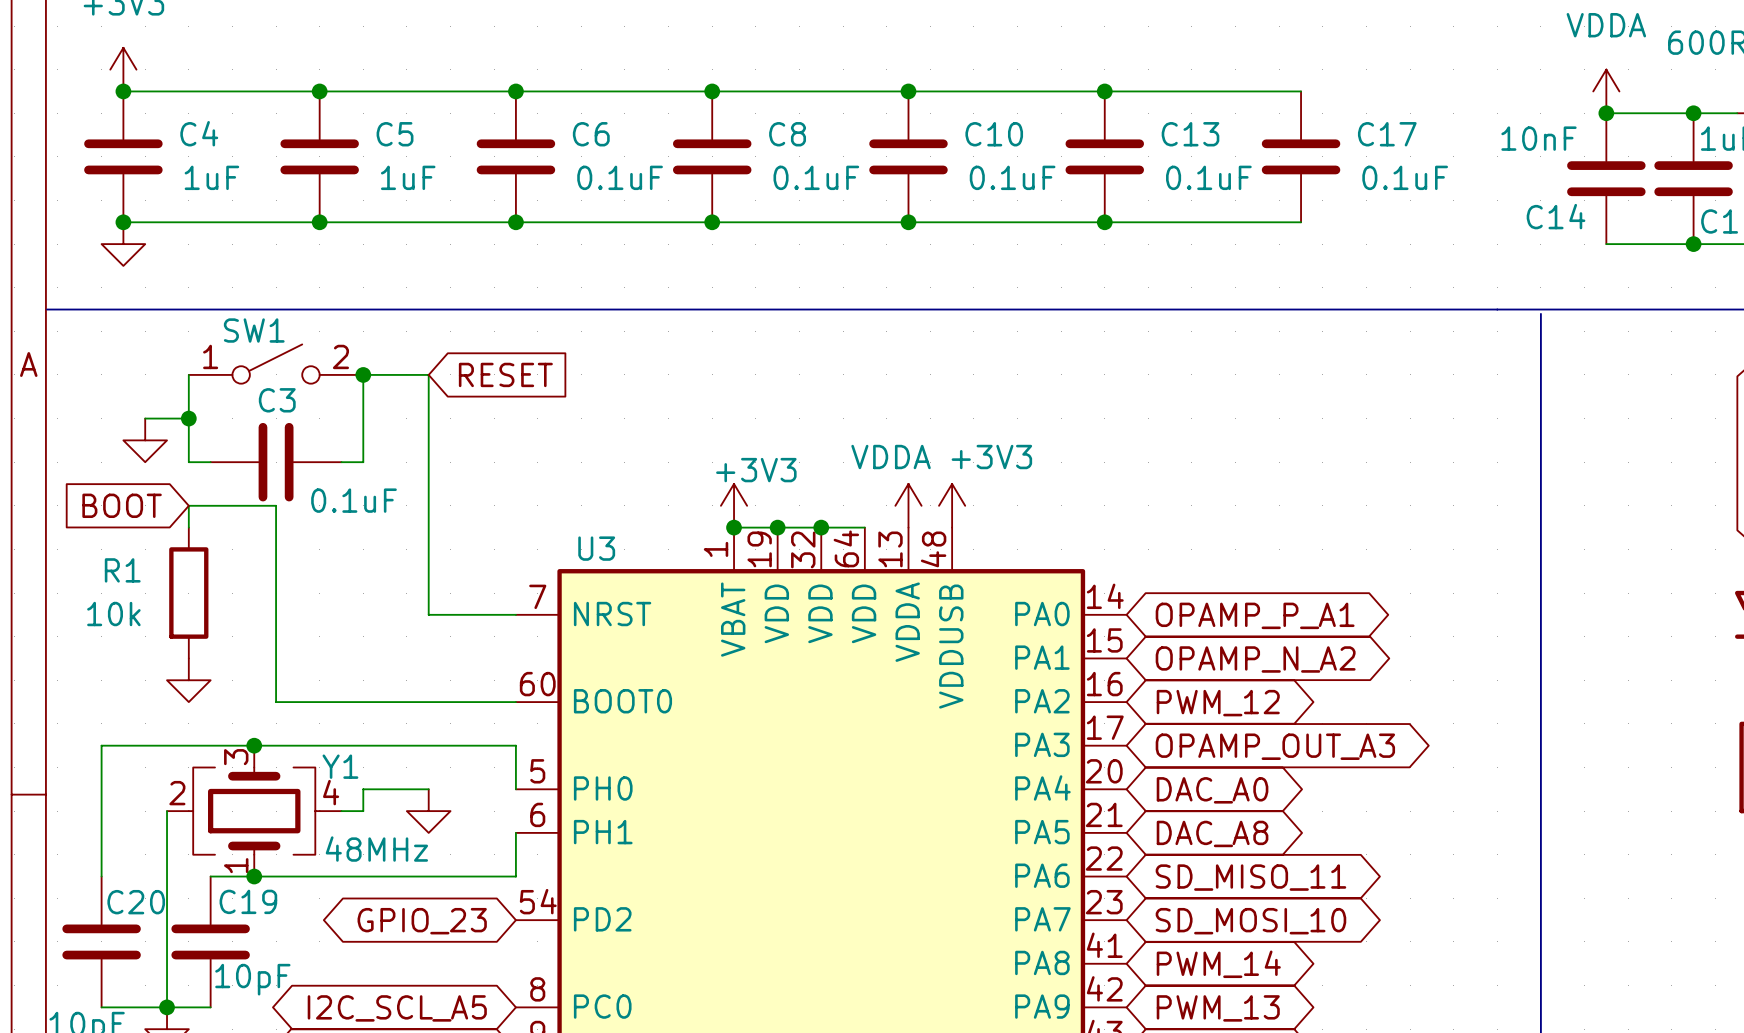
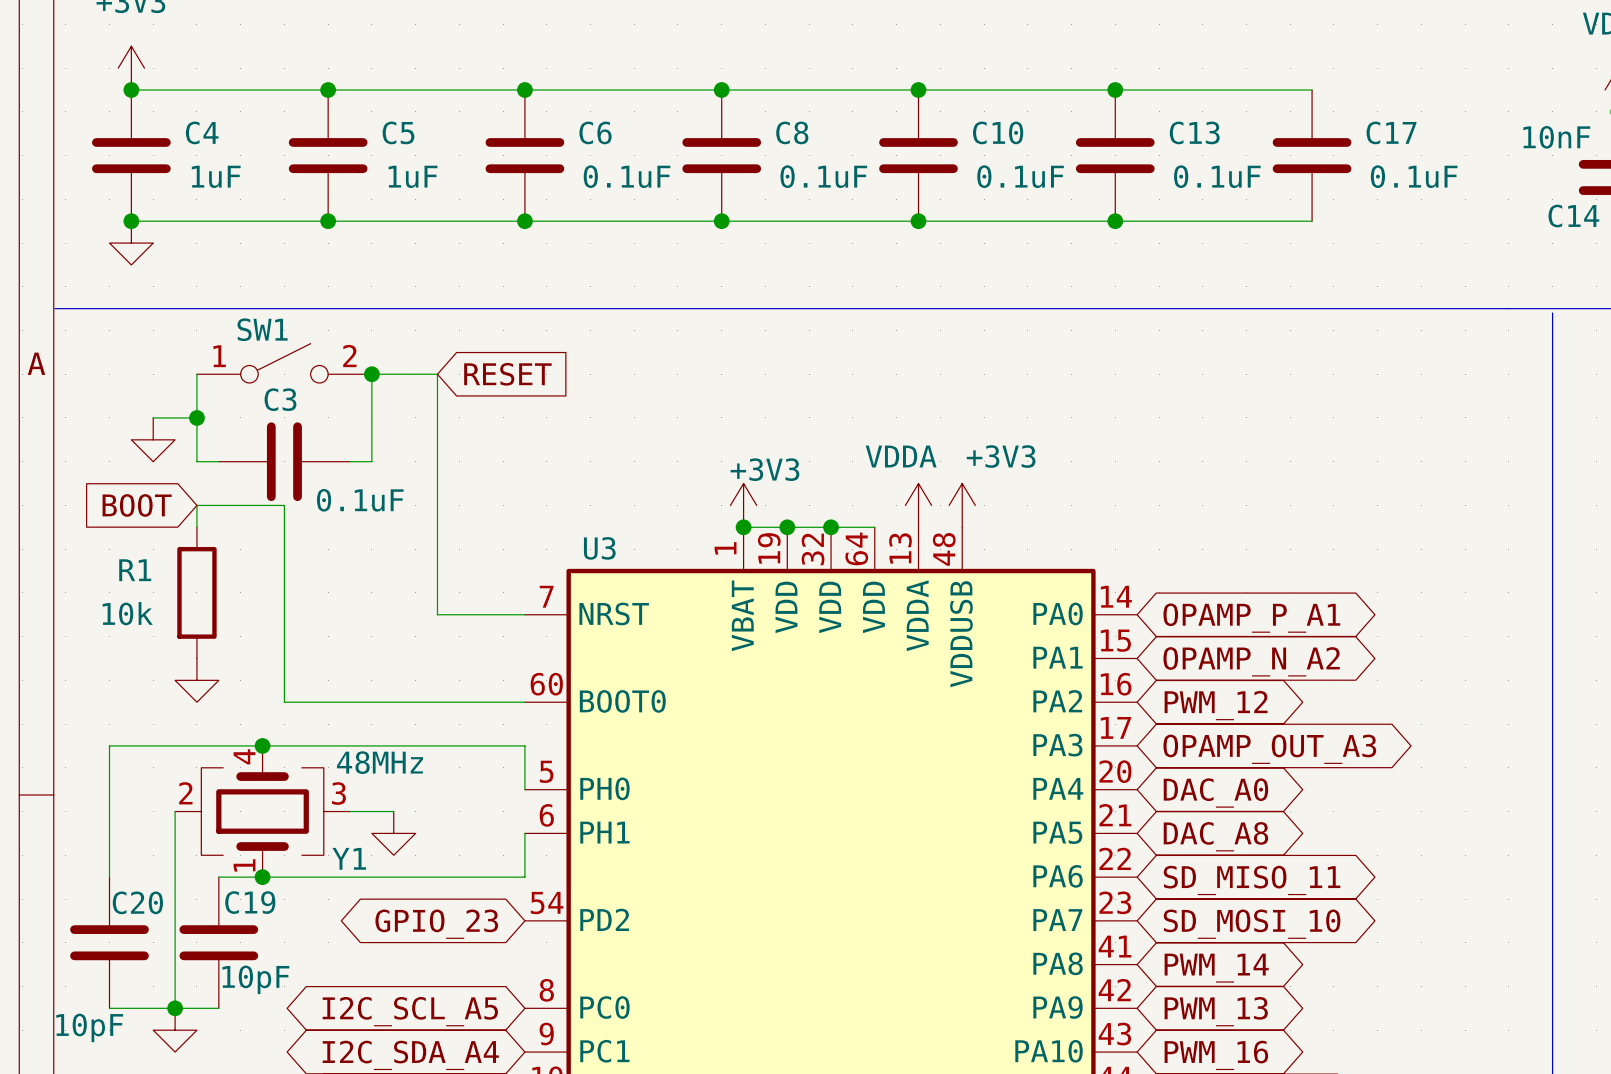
Y1 pin number: 3 (236, 757) -> 4 (244, 756)
Y1 name position: Y1 (340, 766) -> Y1 (349, 858)
wire: (428, 789) (363, 789) (363, 811) -> (393, 811) (371, 811)
Y1 pin number: 4 (331, 792) -> 3 (338, 793)
power symbol position: (428, 811) -> (393, 833)
Y1 value position: 48MHz (376, 849) -> 48MHz (379, 762)

